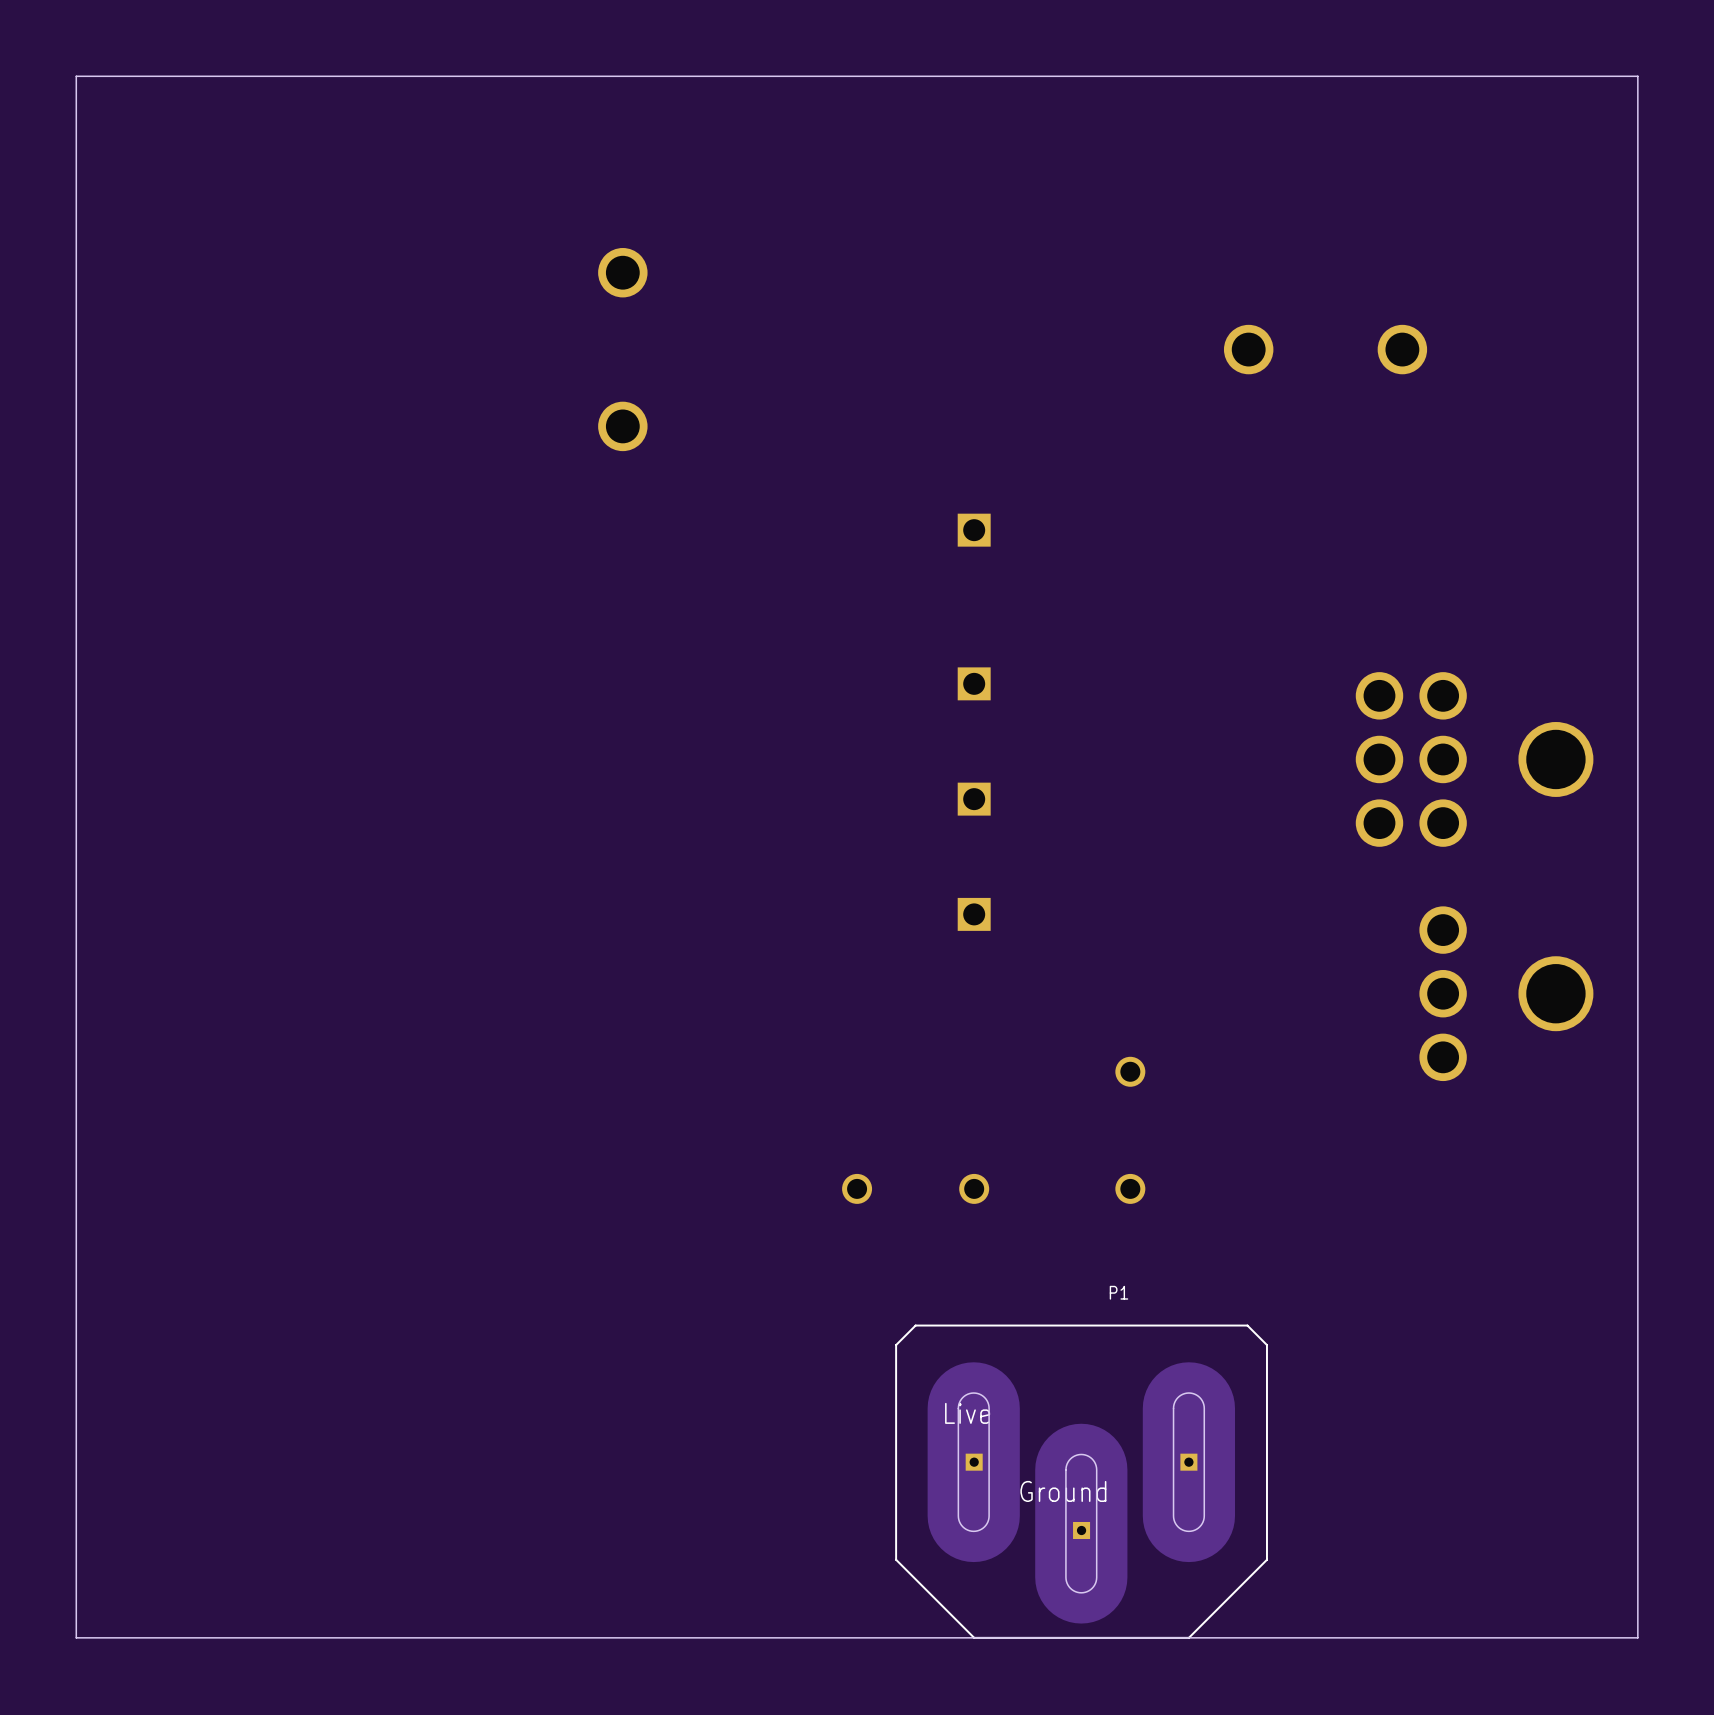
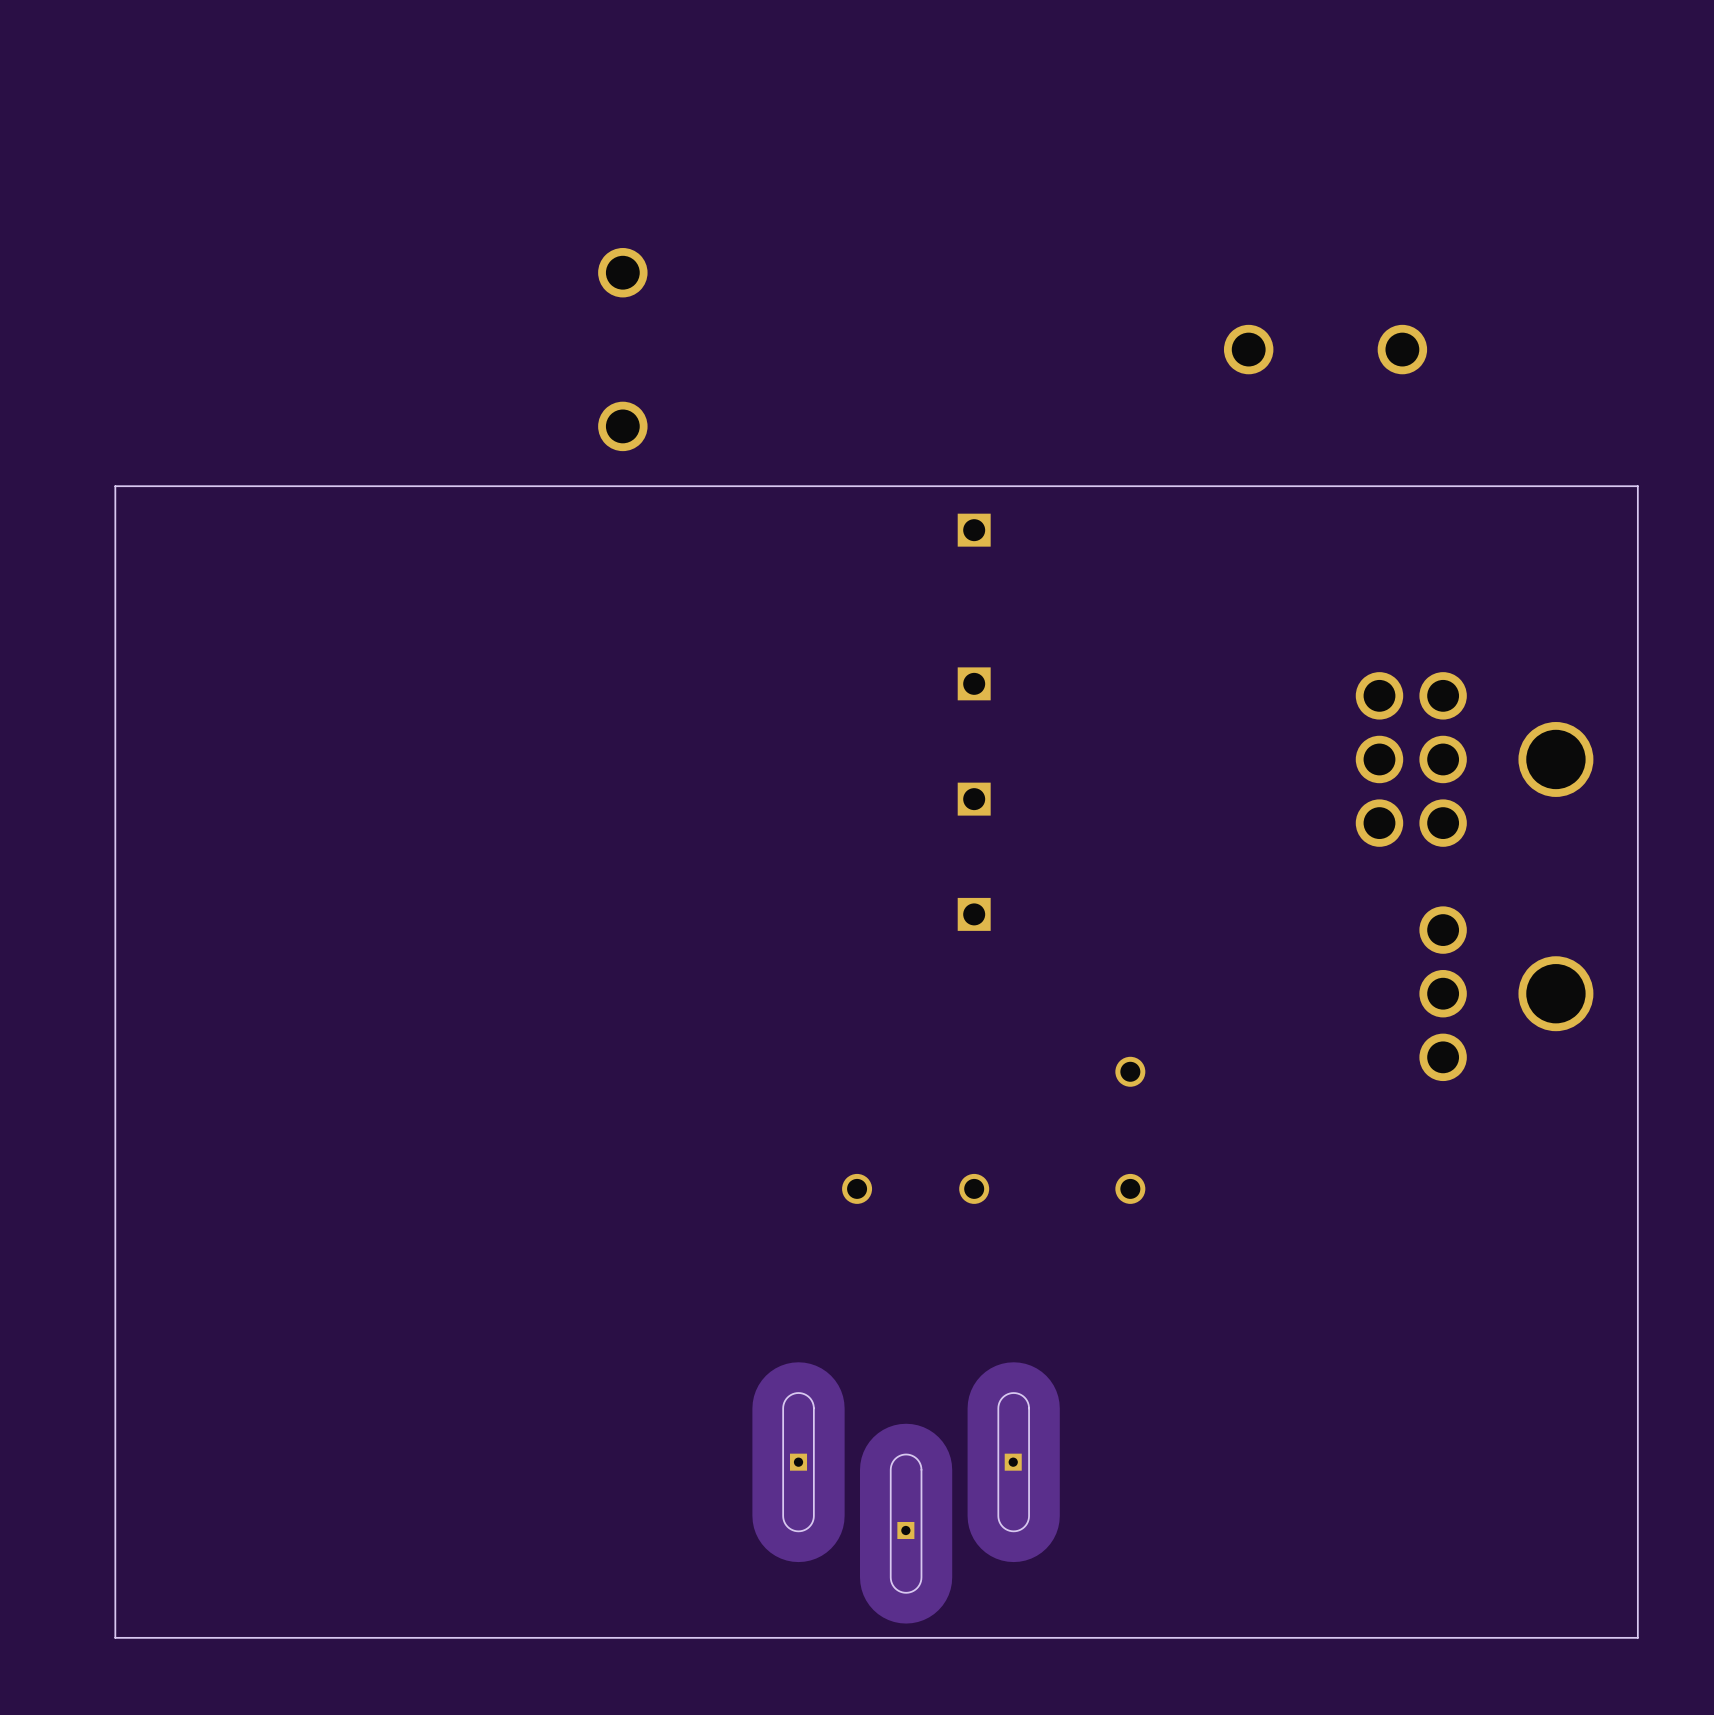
board edge: (1637, 486) (1637, 76) (76, 76) (76, 1637) (115, 1637) -> (1637, 486) (115, 486) (115, 1637)
P1 side: bottom (1081, 1481) -> top (906, 1492)

